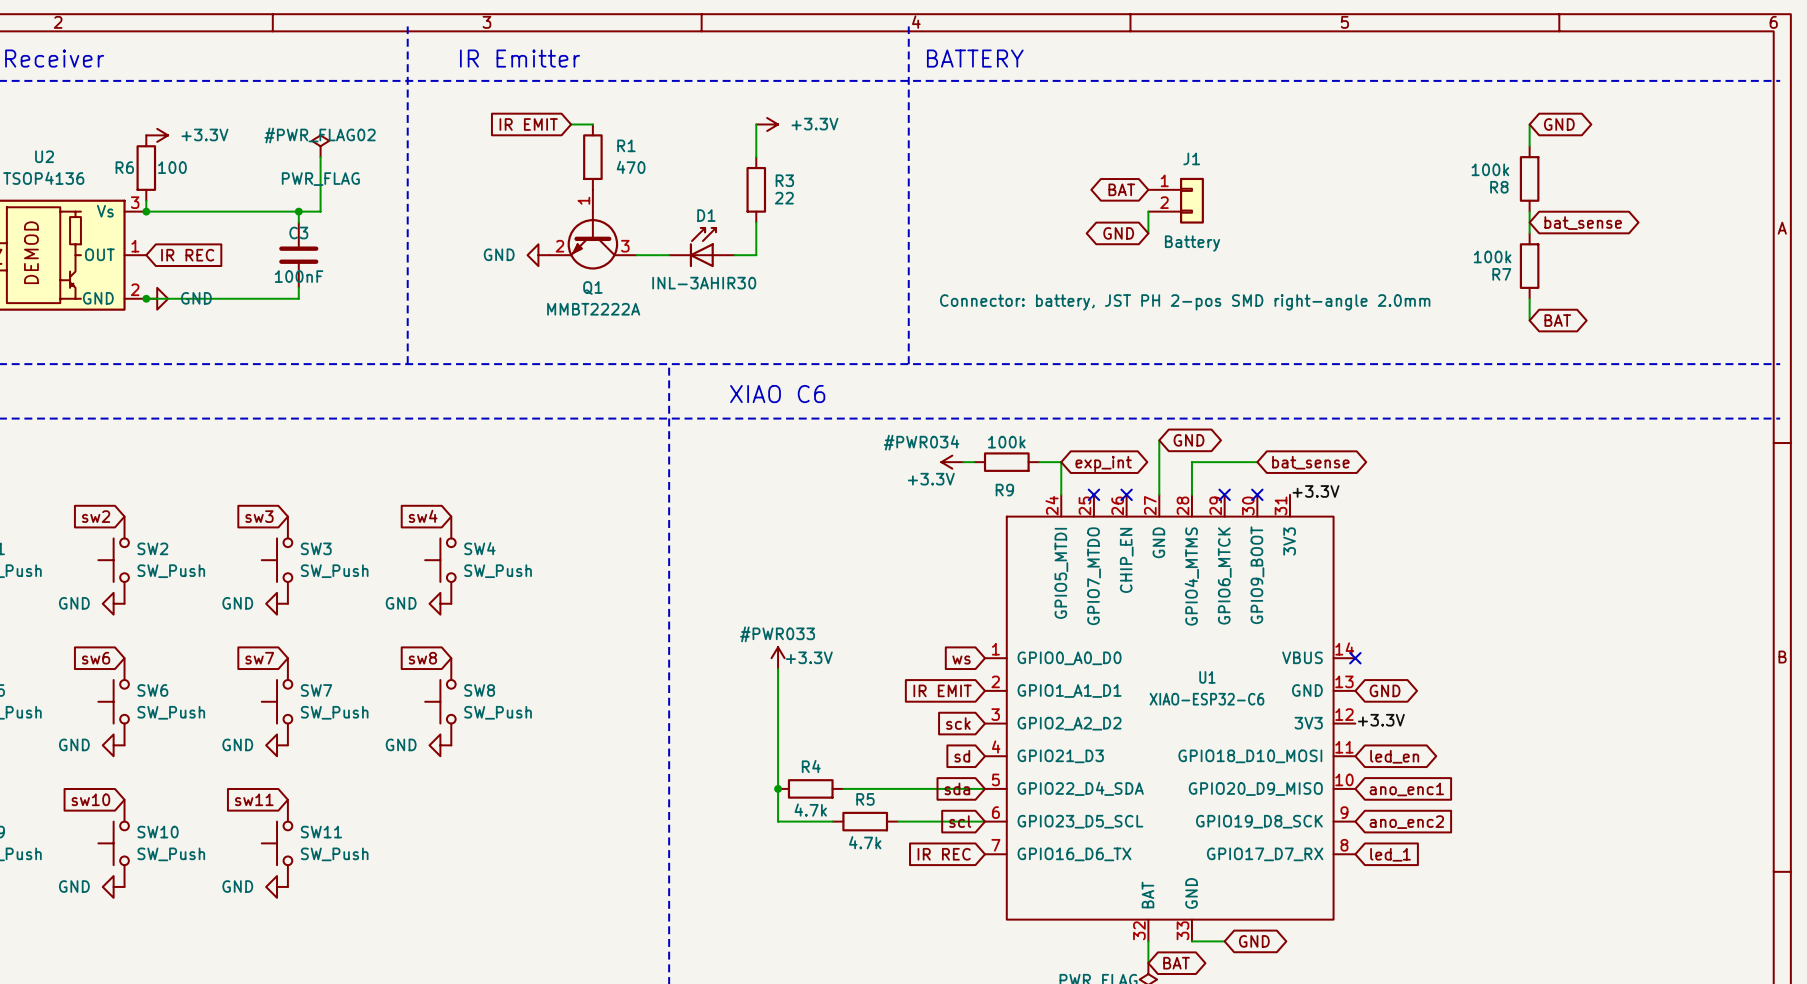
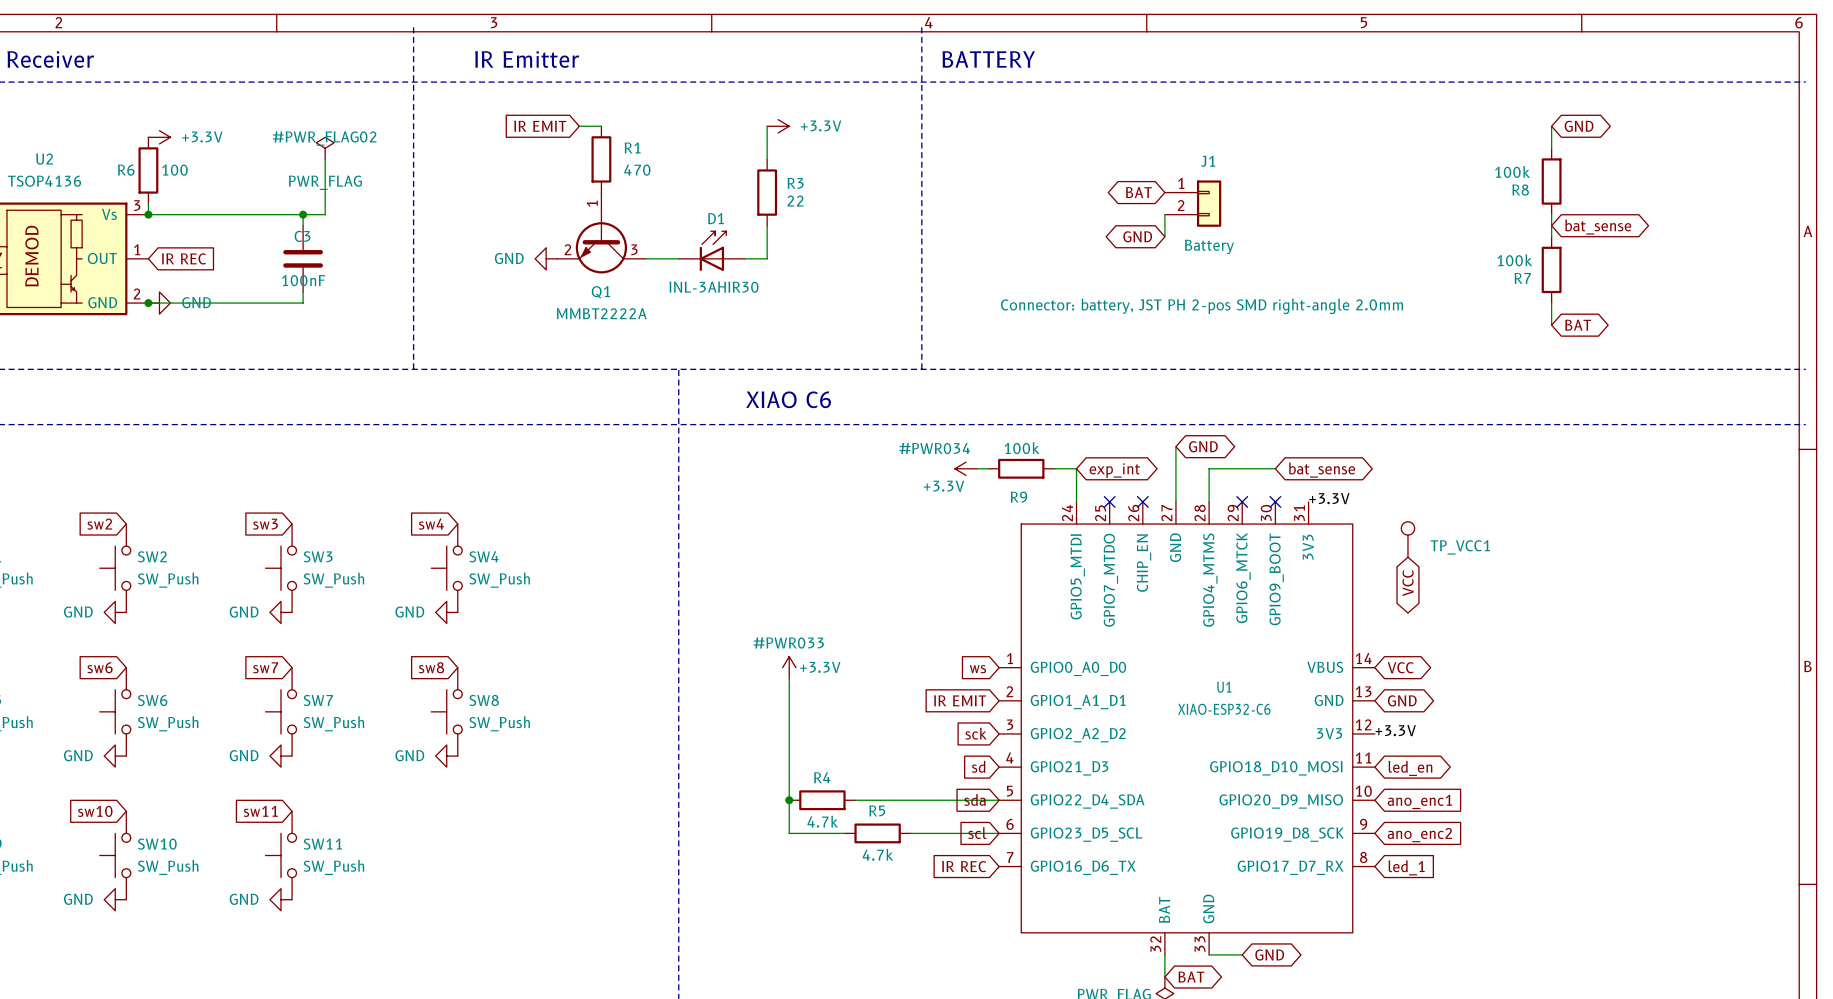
TP_VCC1: none -> (1407, 539)
global label: none -> VCC (1408, 583)
no-connect mark: (1355, 658) -> none
global label: none -> VCC (1400, 667)

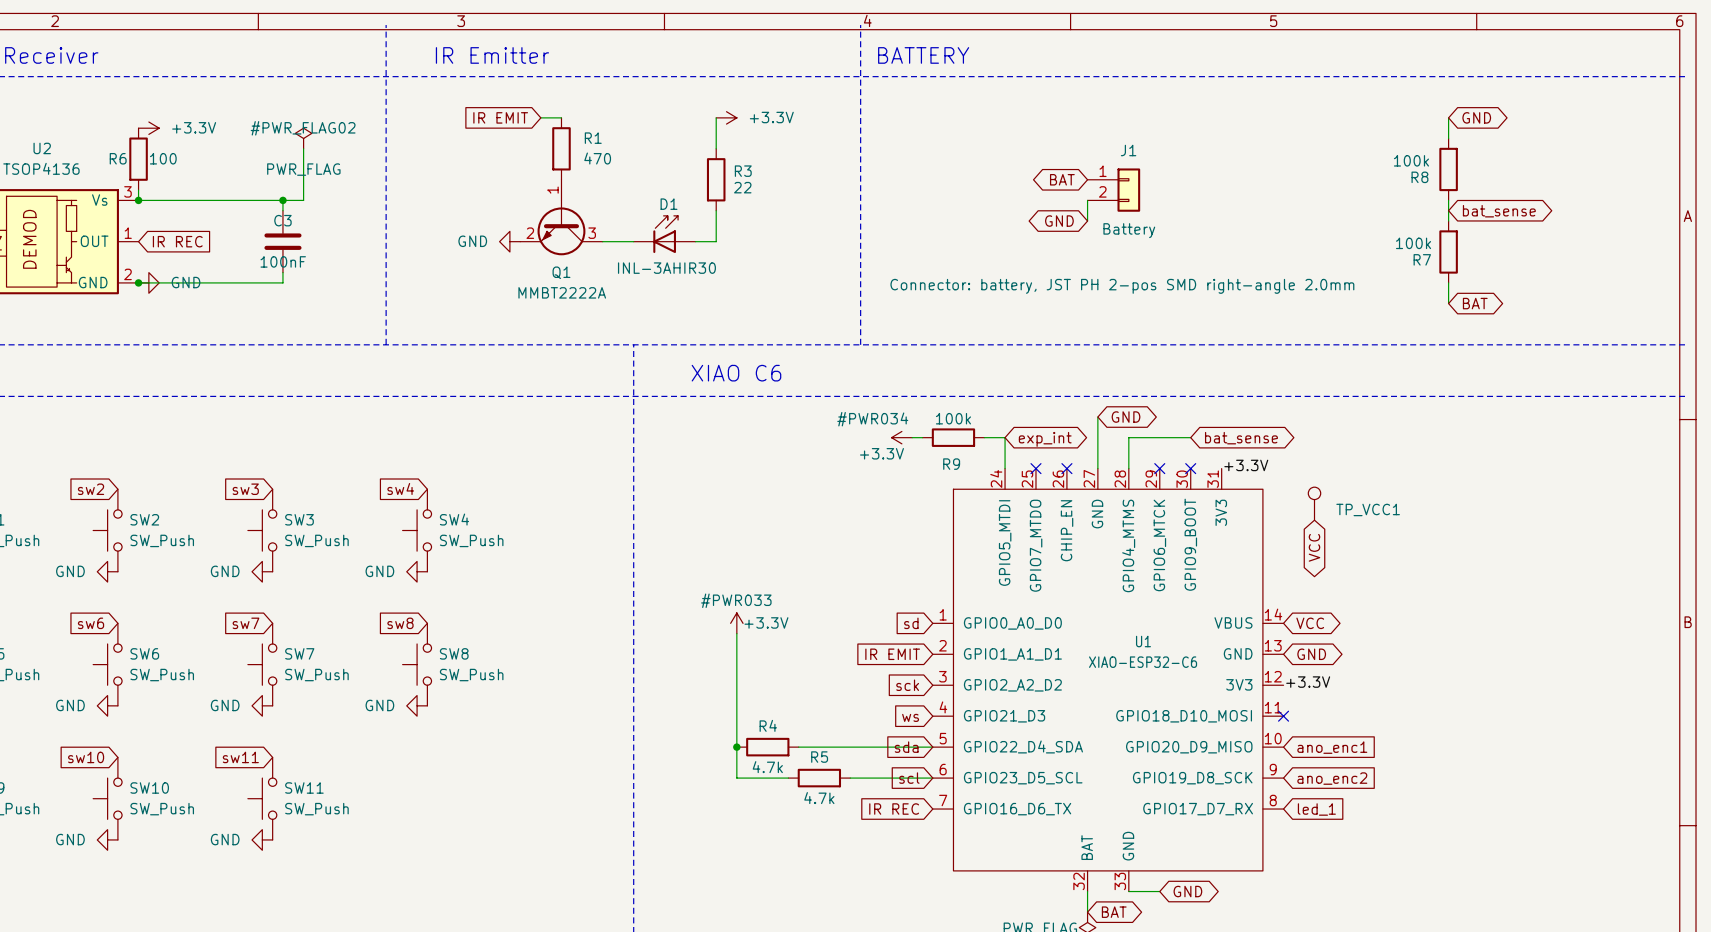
global label: ws (977, 669) -> sd (911, 623)
global label: sd (978, 766) -> ws (910, 717)
no-connect mark: none -> (1283, 716)
global label: led_en (1410, 768) -> none

